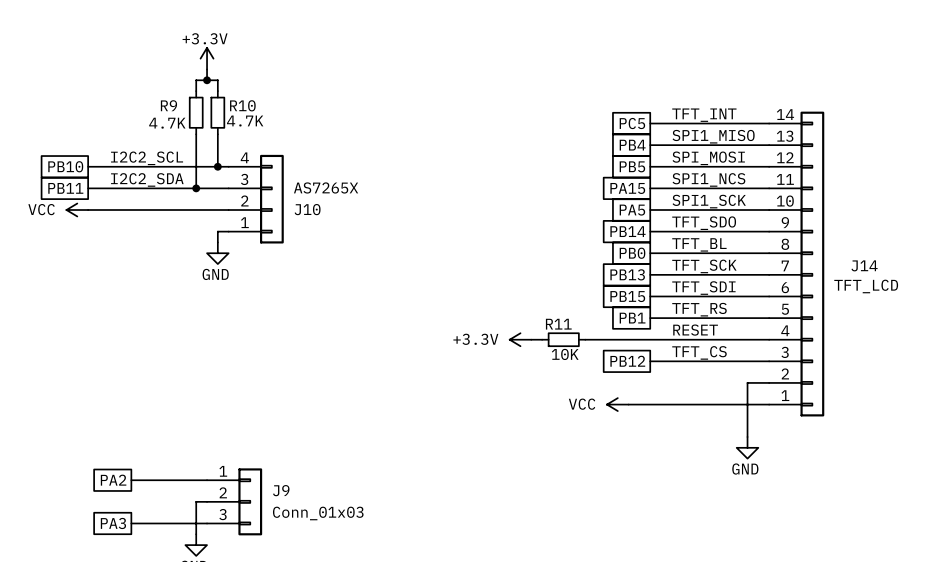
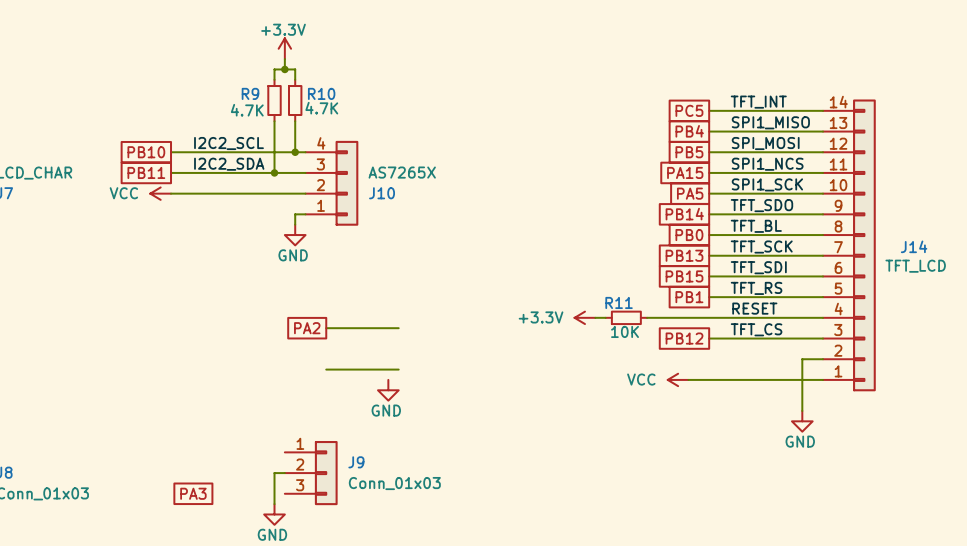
power symbol: none -> GND (388, 390)
global label position: PA2 (113, 480) -> PA2 (307, 328)
wire: (131, 480) (207, 480) -> (326, 328) (398, 328)
wire: (131, 523) (207, 523) -> (326, 369) (398, 369)

